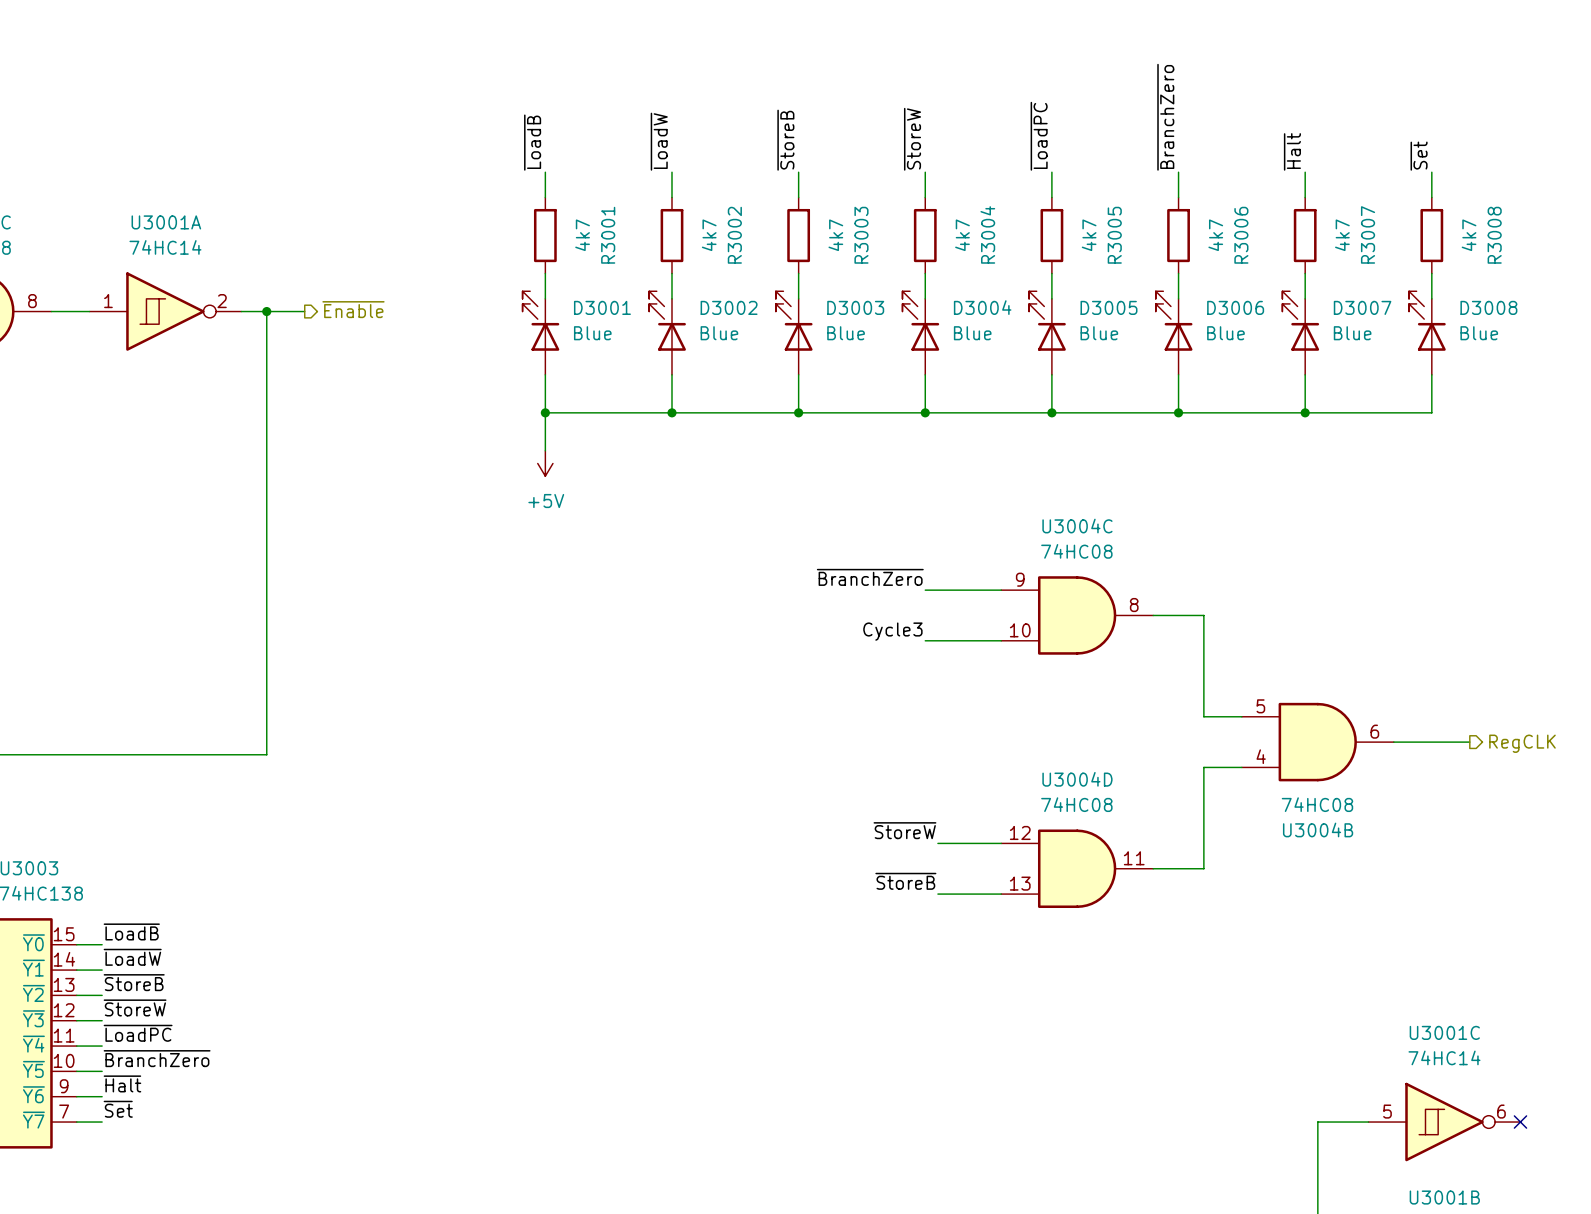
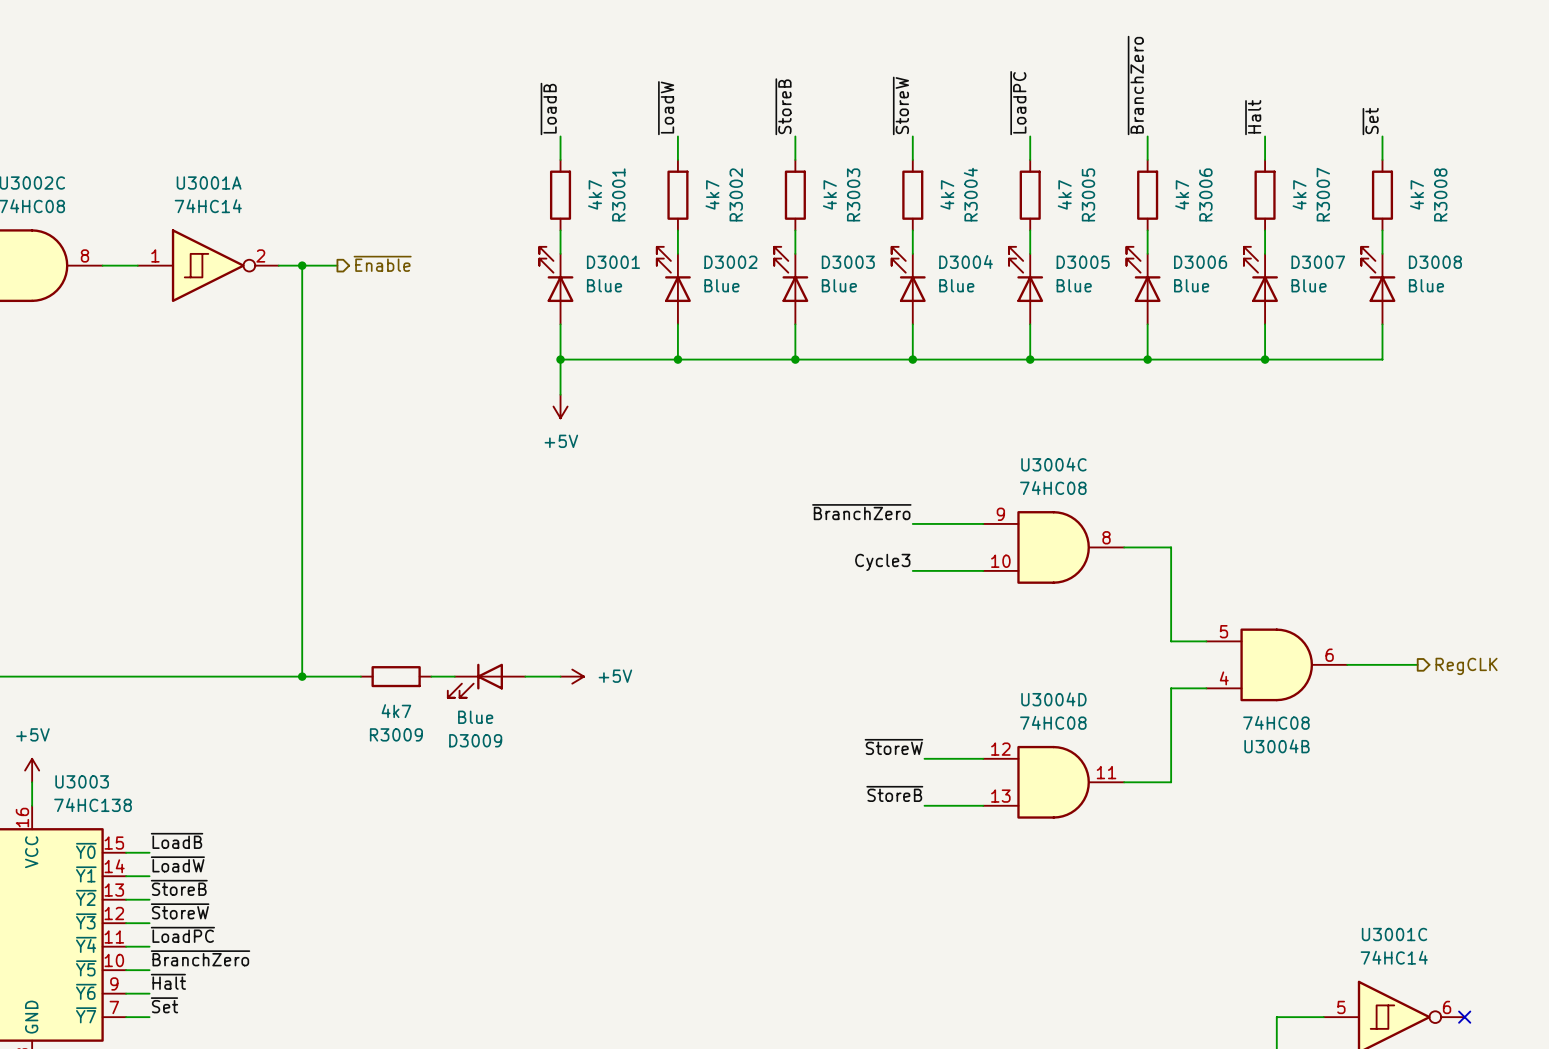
wire: none -> (302, 676) (360, 676)
junction: none -> (302, 676)
R3009: none -> 4k7 (396, 676)
wire: none -> (431, 676) (454, 676)
wire: none -> (525, 676) (560, 676)
power symbol: none -> +5V (572, 676)
D3009: none -> Blue (486, 680)

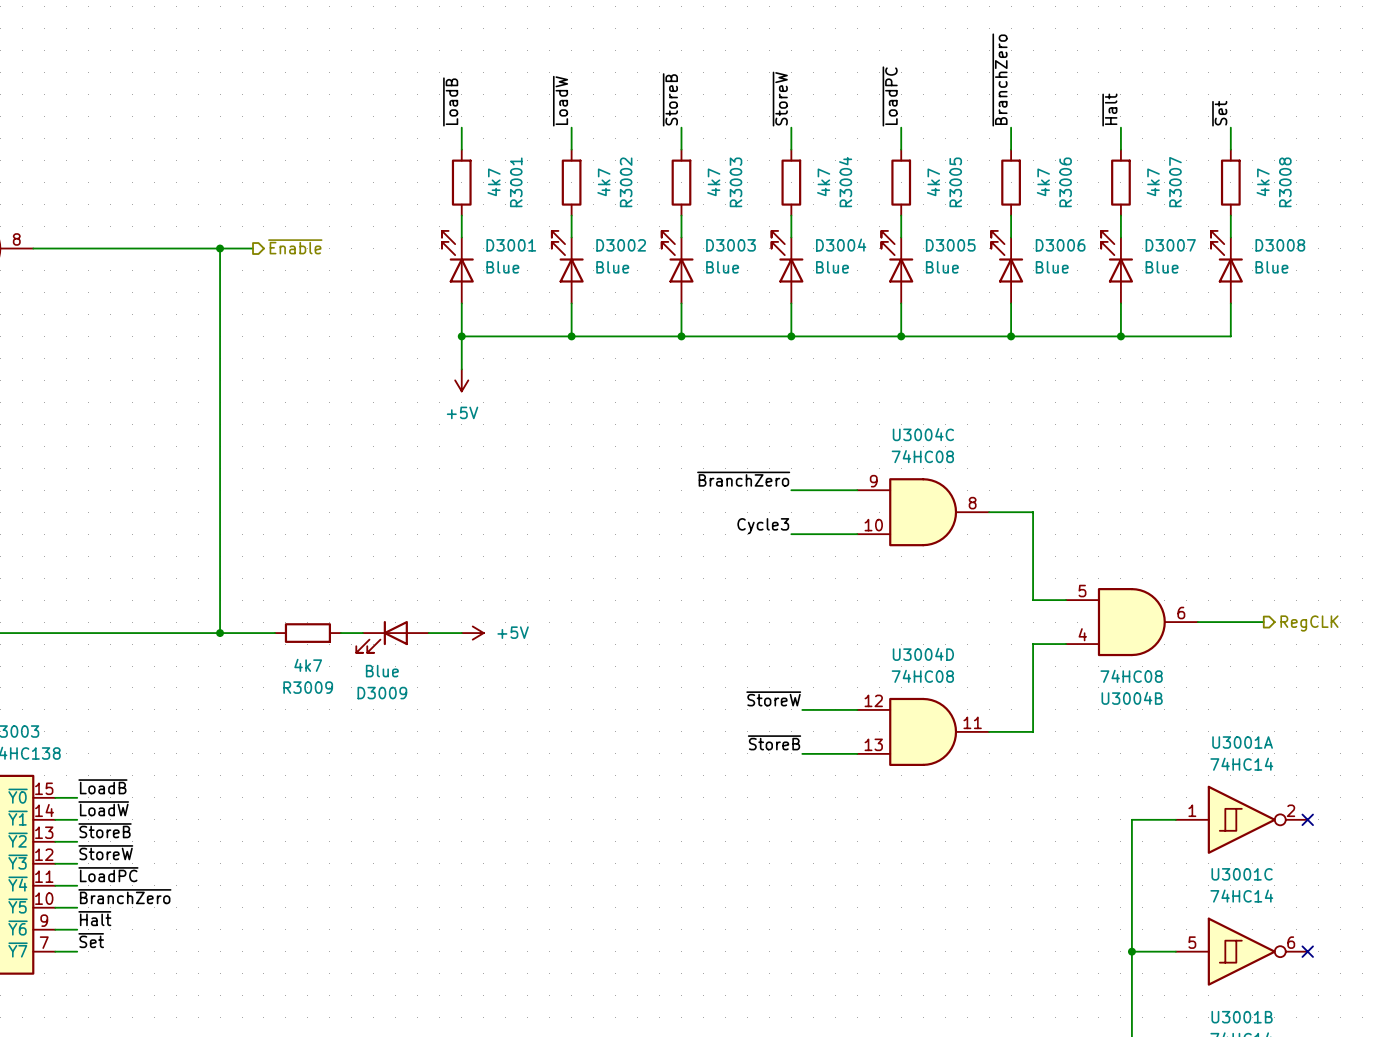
U3001A position: (208, 265) -> (1241, 819)
wire: none -> (1175, 819) (1131, 819) (1131, 951)
no-connect mark: none -> (1307, 819)
junction: none -> (1131, 951)

